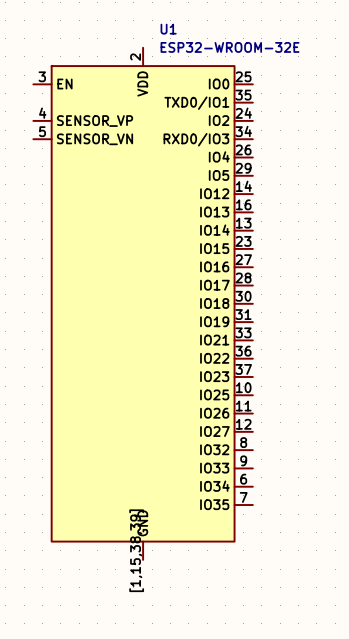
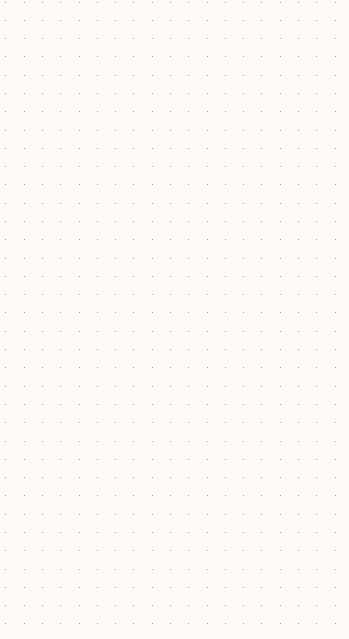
U1: ESP32-WROOM-32E (143, 303) -> none

